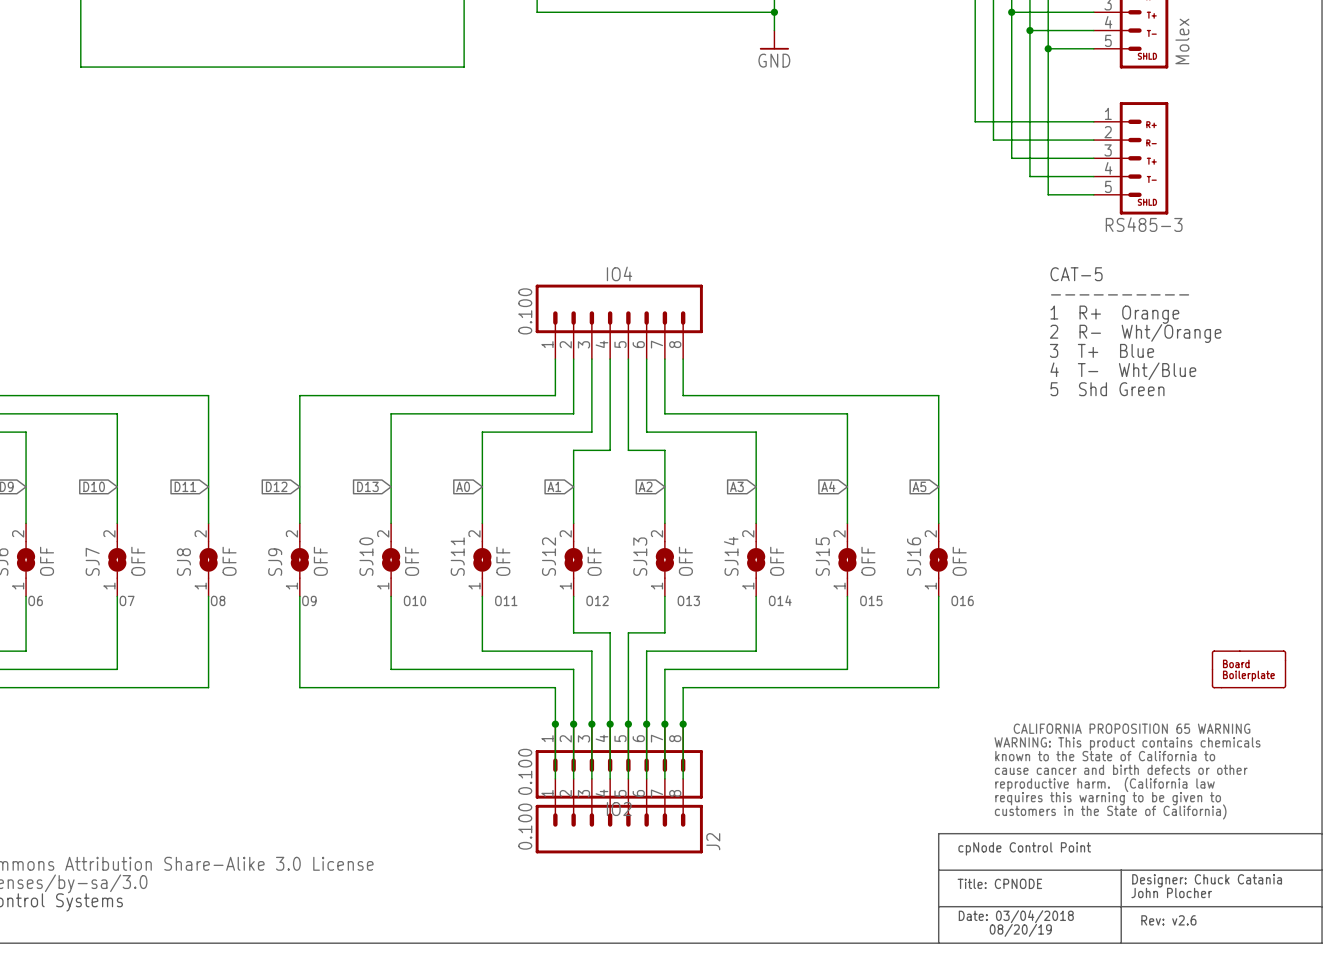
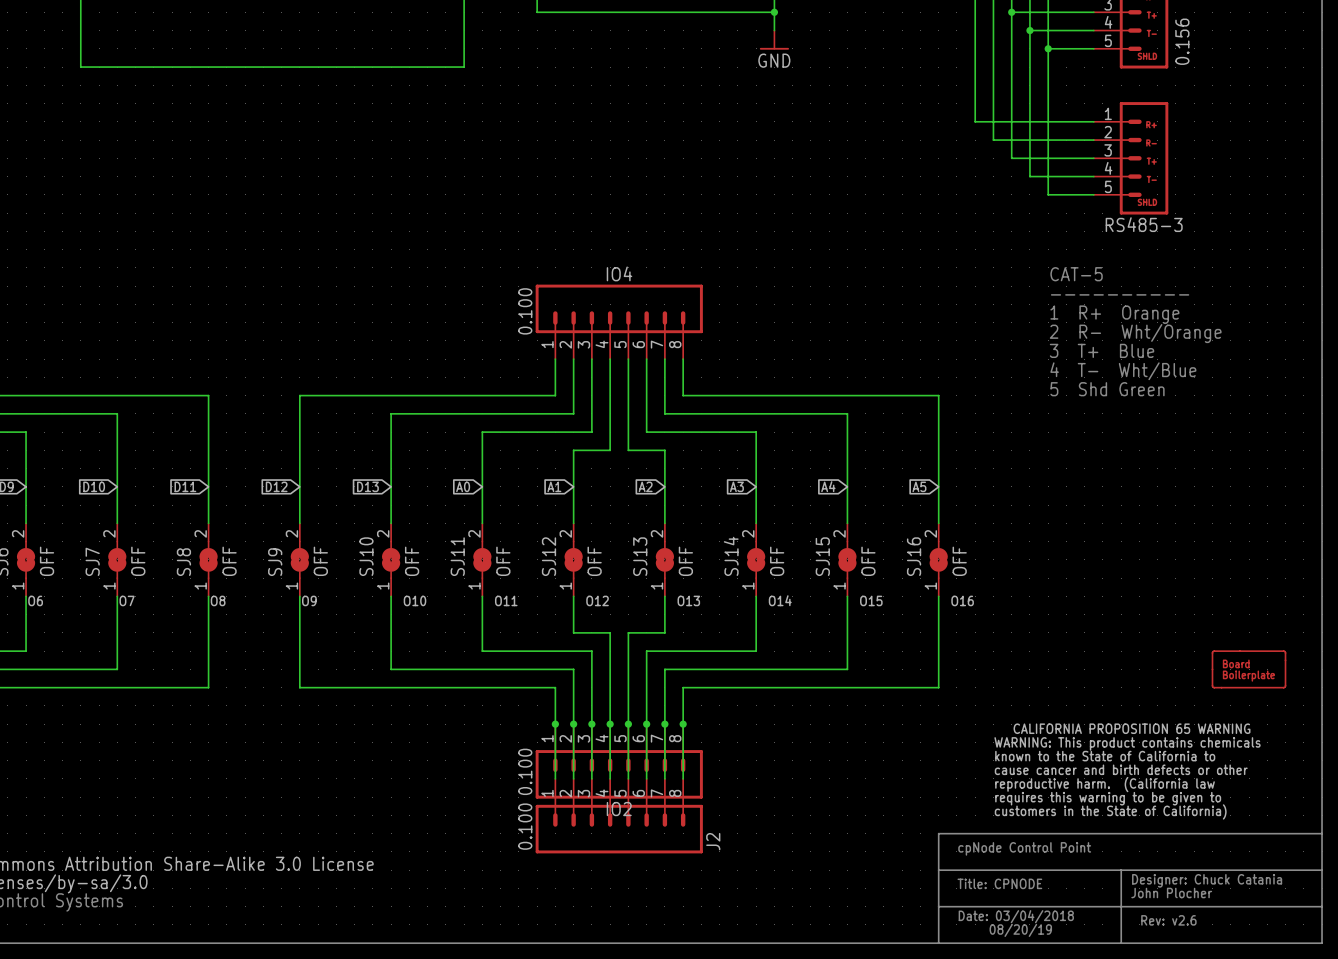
part value: Molex (1182, 41) -> 0.156 (1182, 41)

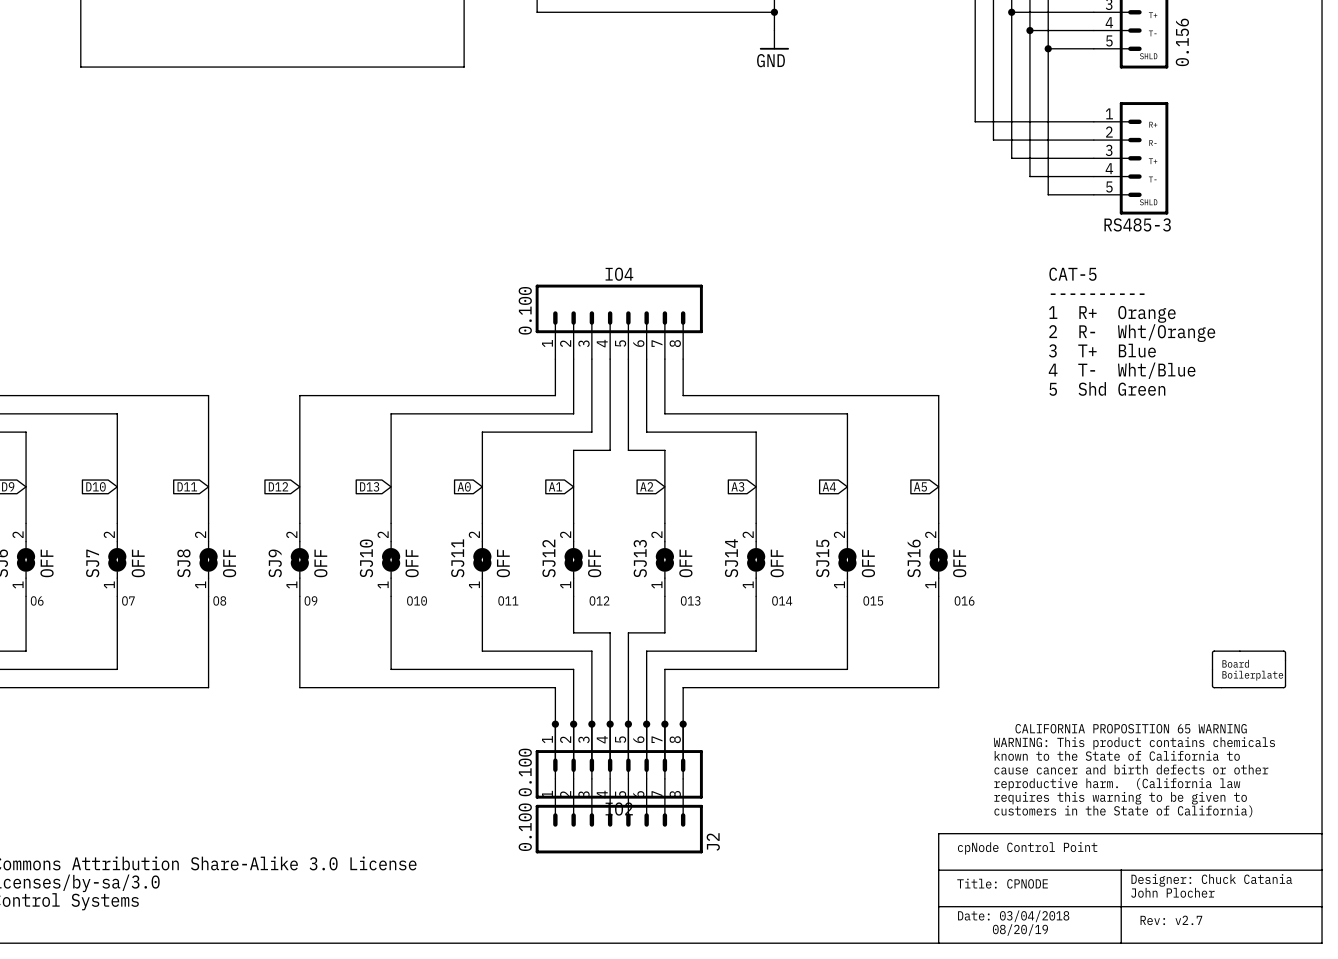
text: Rev: v2.6 (1168, 920) -> Rev: v2.7 (1171, 920)

